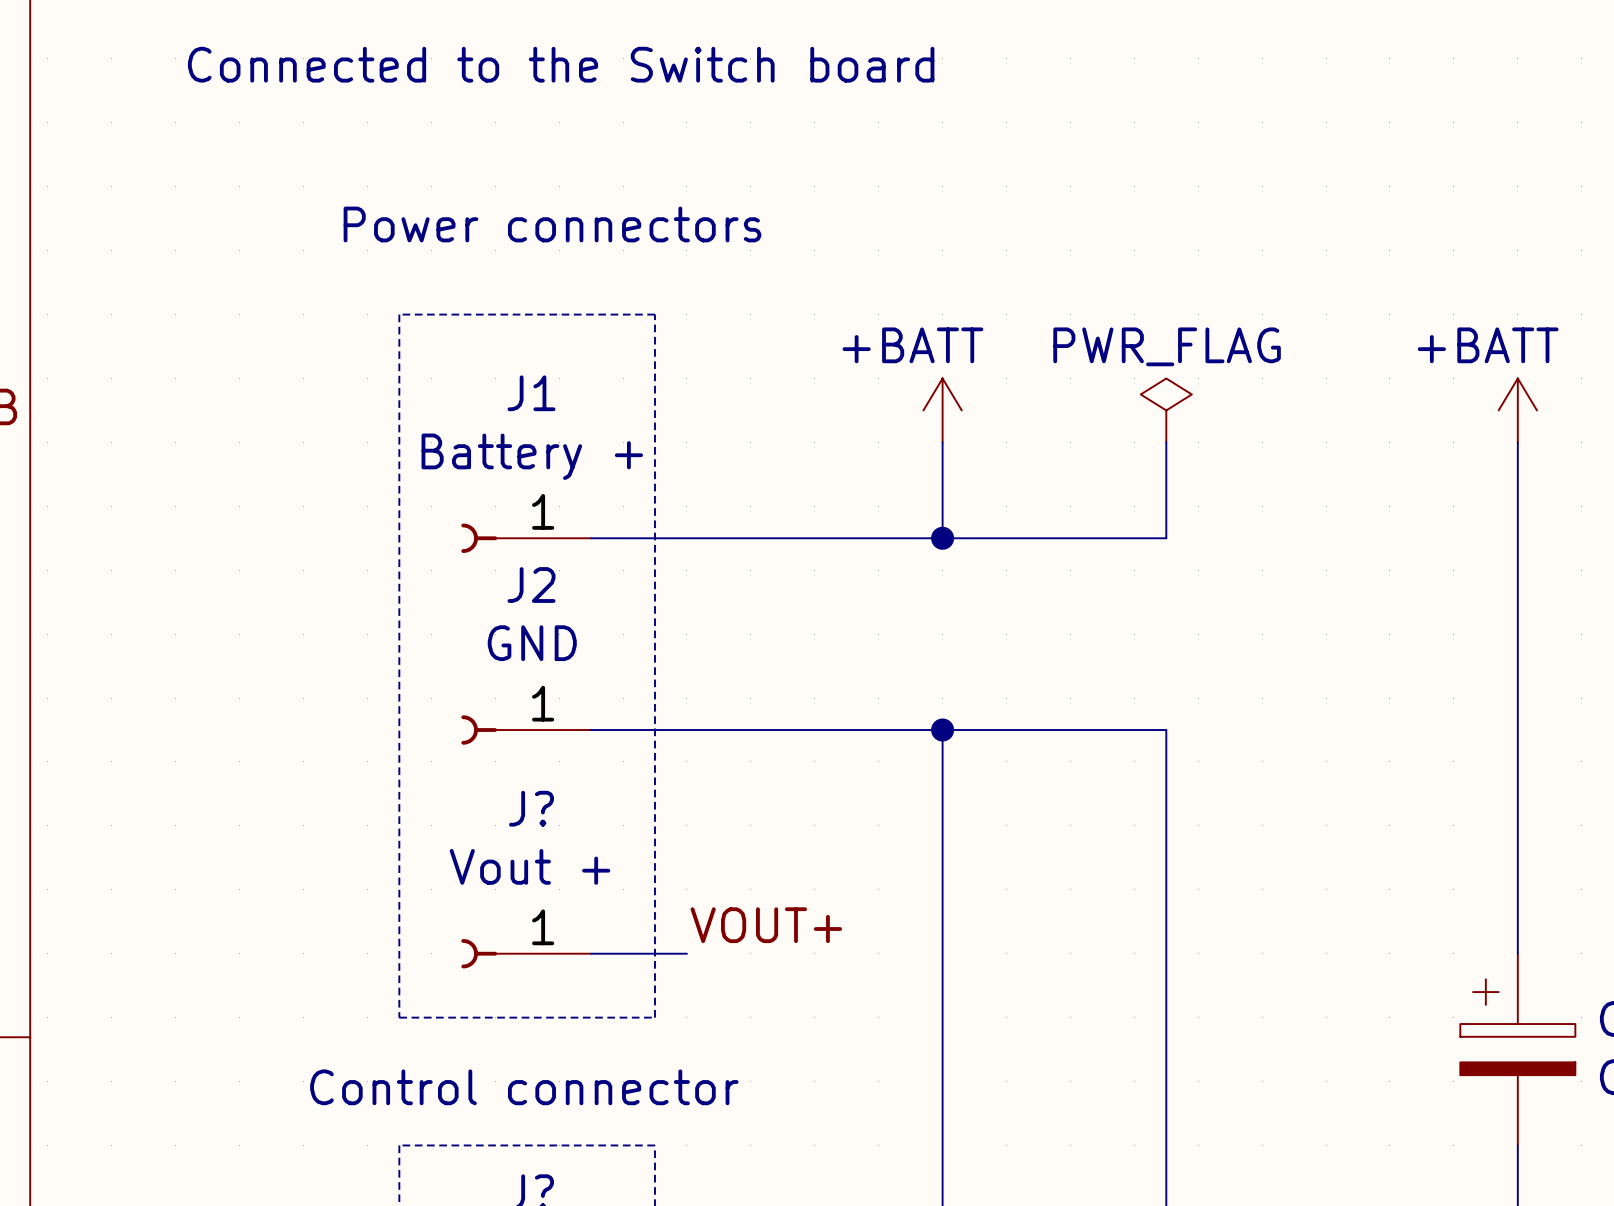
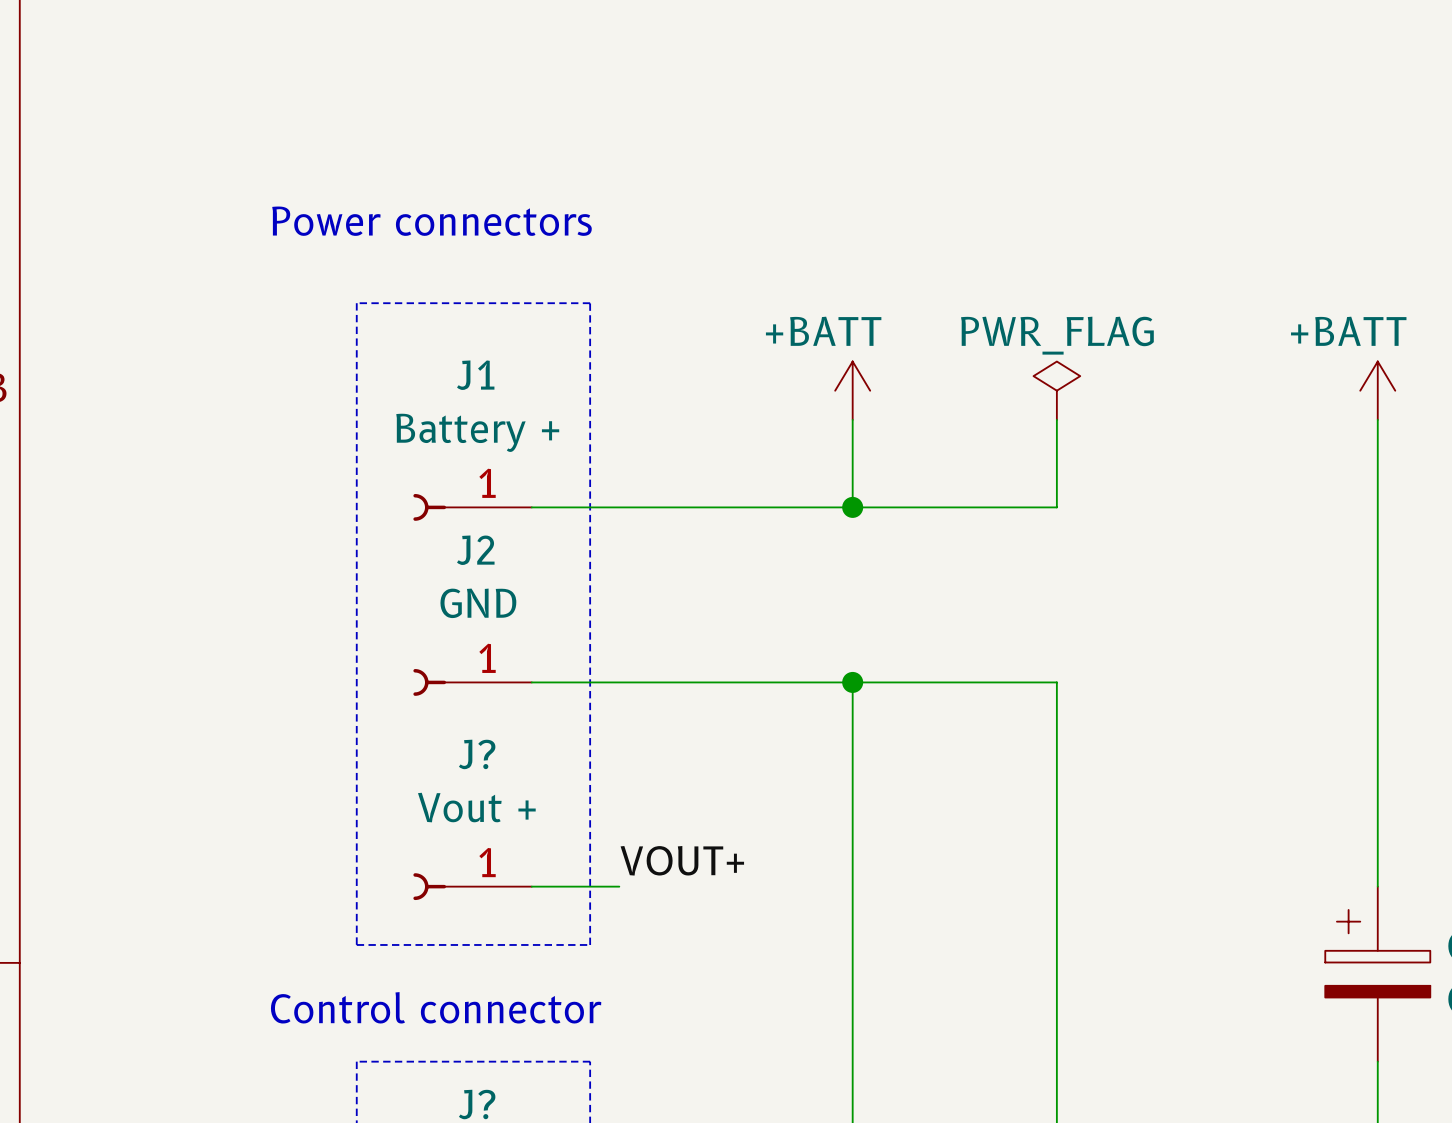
text: Connected to the Switch board (561, 64) -> none
text position: Power connectors (552, 224) -> Power connectors (431, 221)

